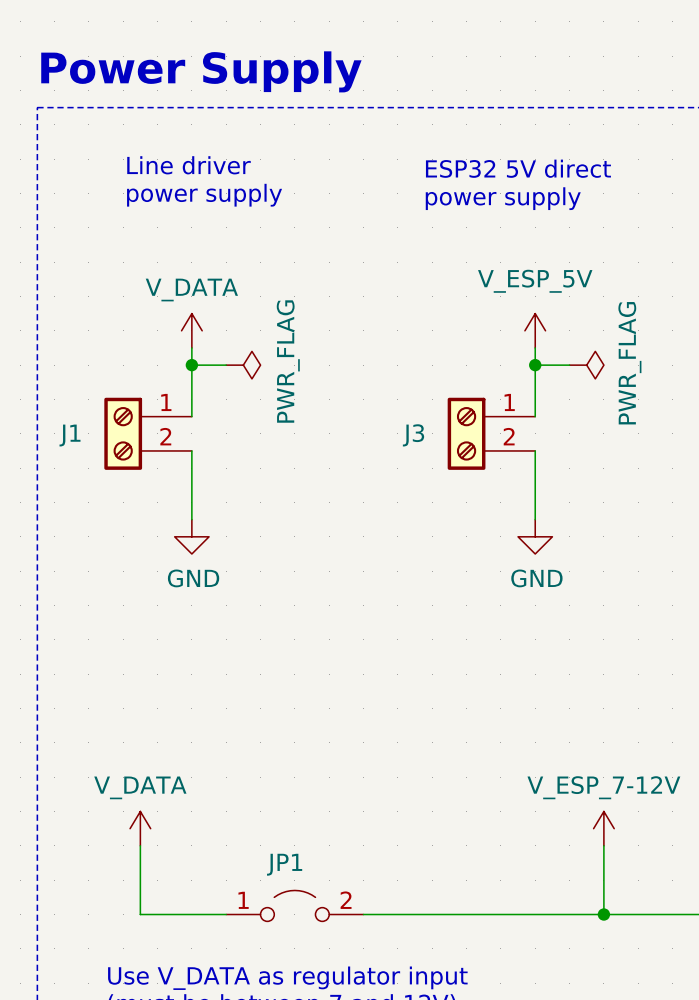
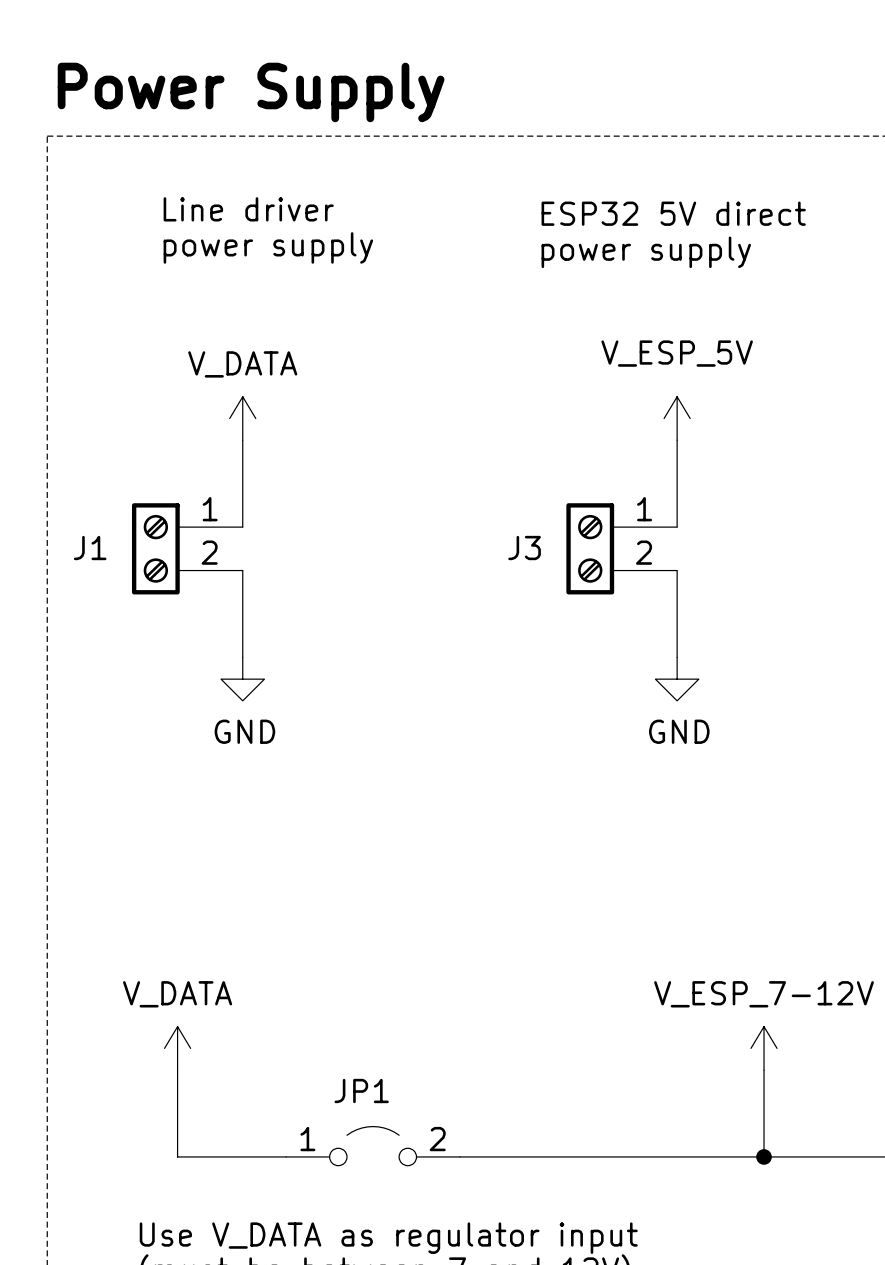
wire: (191, 365) (226, 365) -> none
junction: (191, 365) -> none
power symbol: PWR_FLAG (243, 365) -> none
wire: (535, 365) (569, 365) -> none
junction: (535, 365) -> none
power symbol: PWR_FLAG (586, 365) -> none

